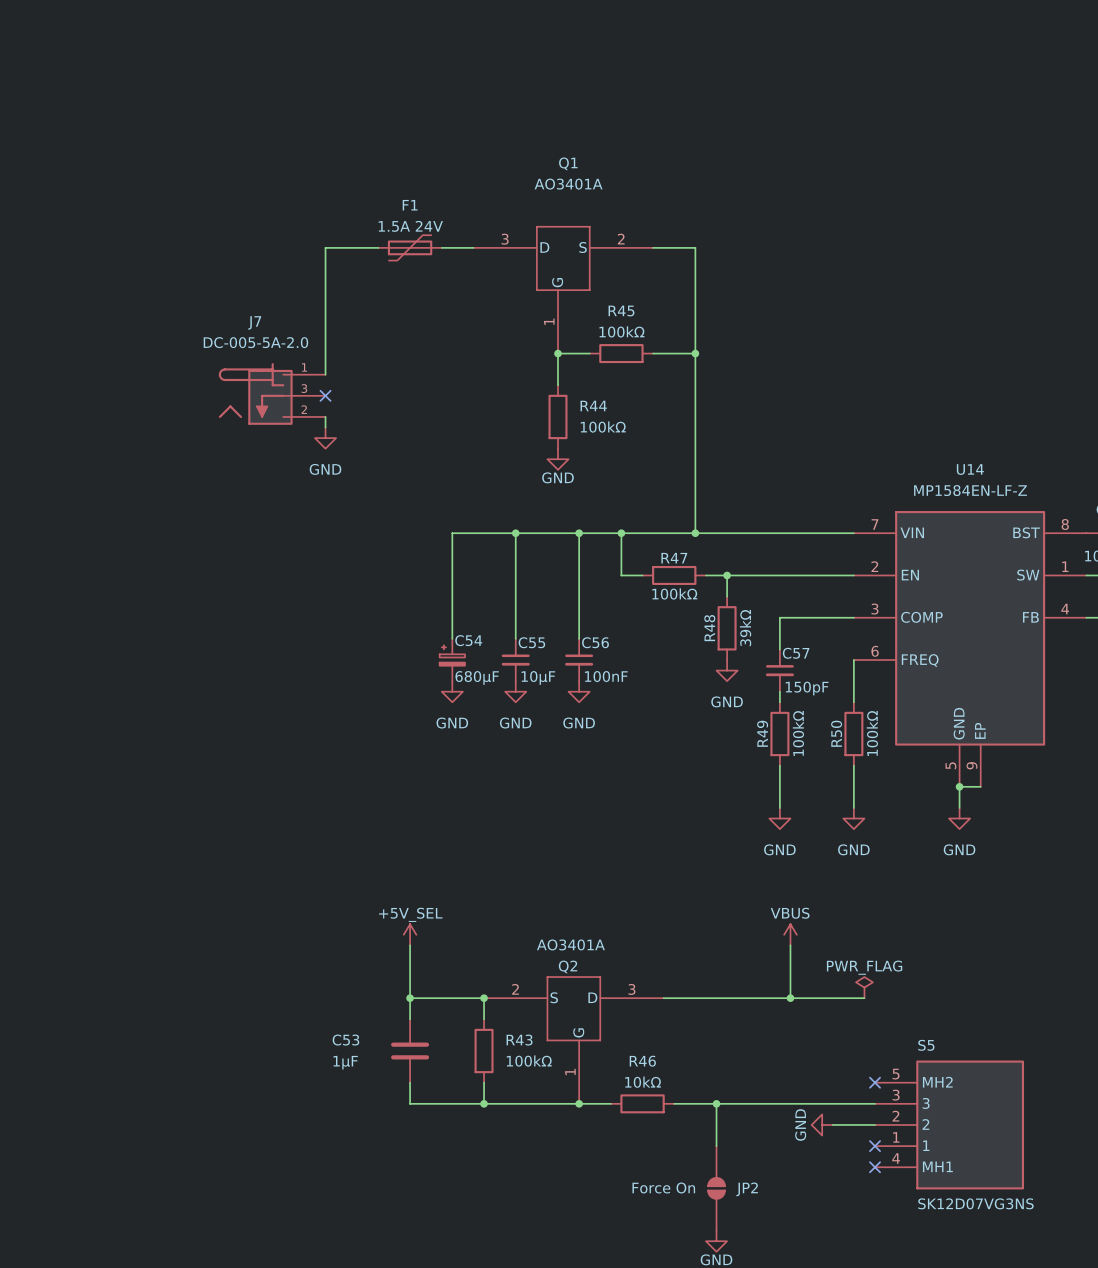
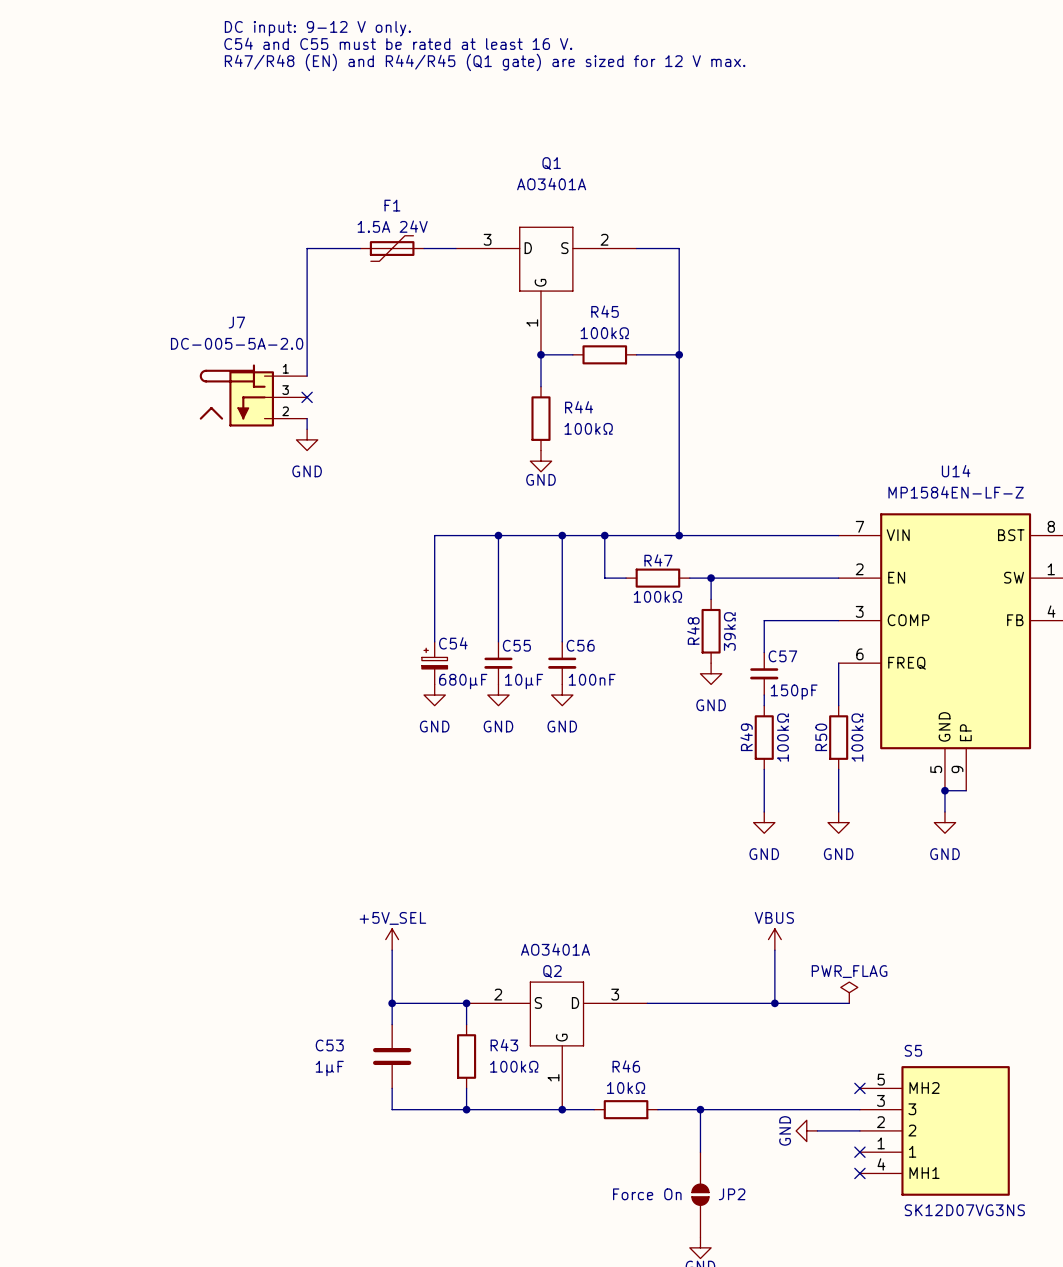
text: none -> DC input: 9-12 V only. (317, 28)
text: none -> C54 and C55 must be rated at least 16 V. (398, 43)
text: none -> R47/R48 (EN) and R44/R45 (Q1 gate) are sized for 12 V max. (485, 62)

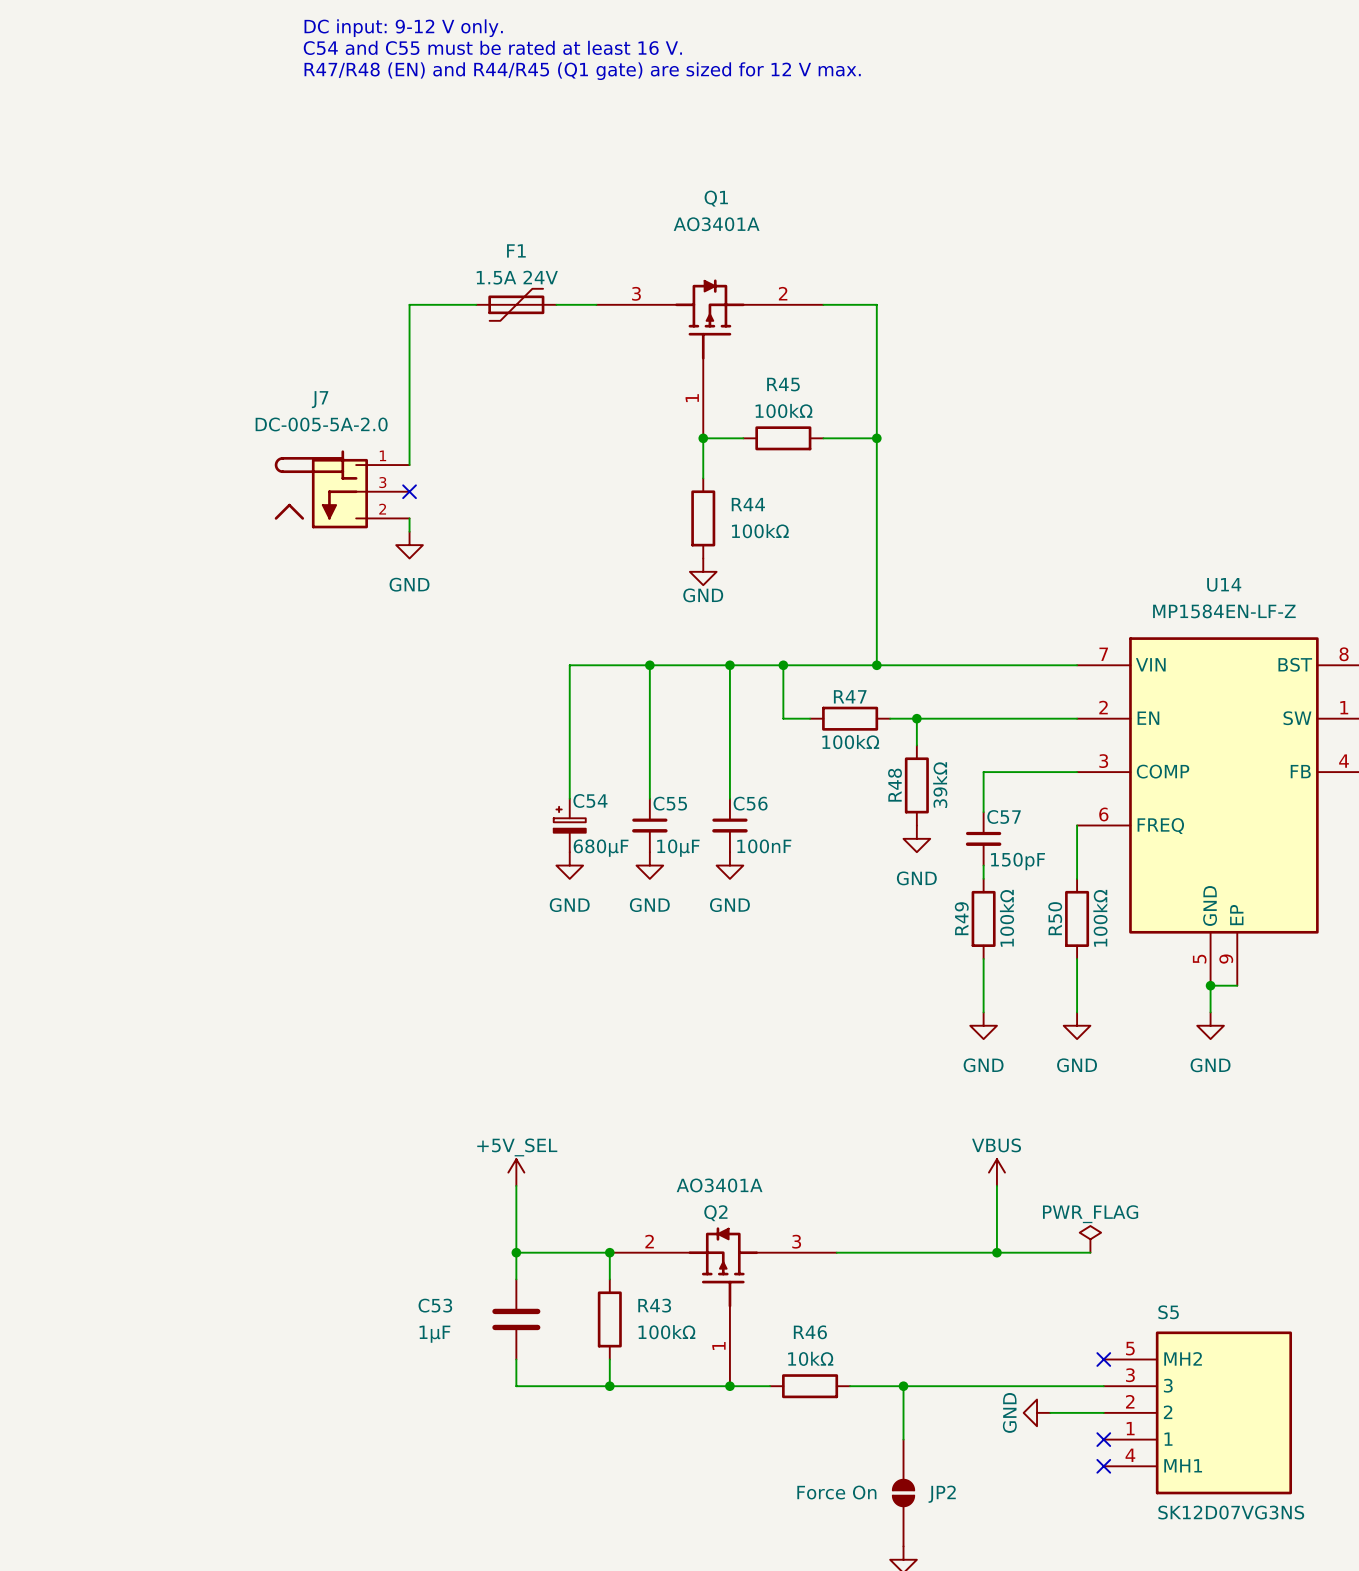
Q1 symbol: [455, 226, 637, 355] -> [596, 279, 824, 439]
Q2 symbol: [466, 981, 648, 1110] -> [609, 1227, 837, 1387]

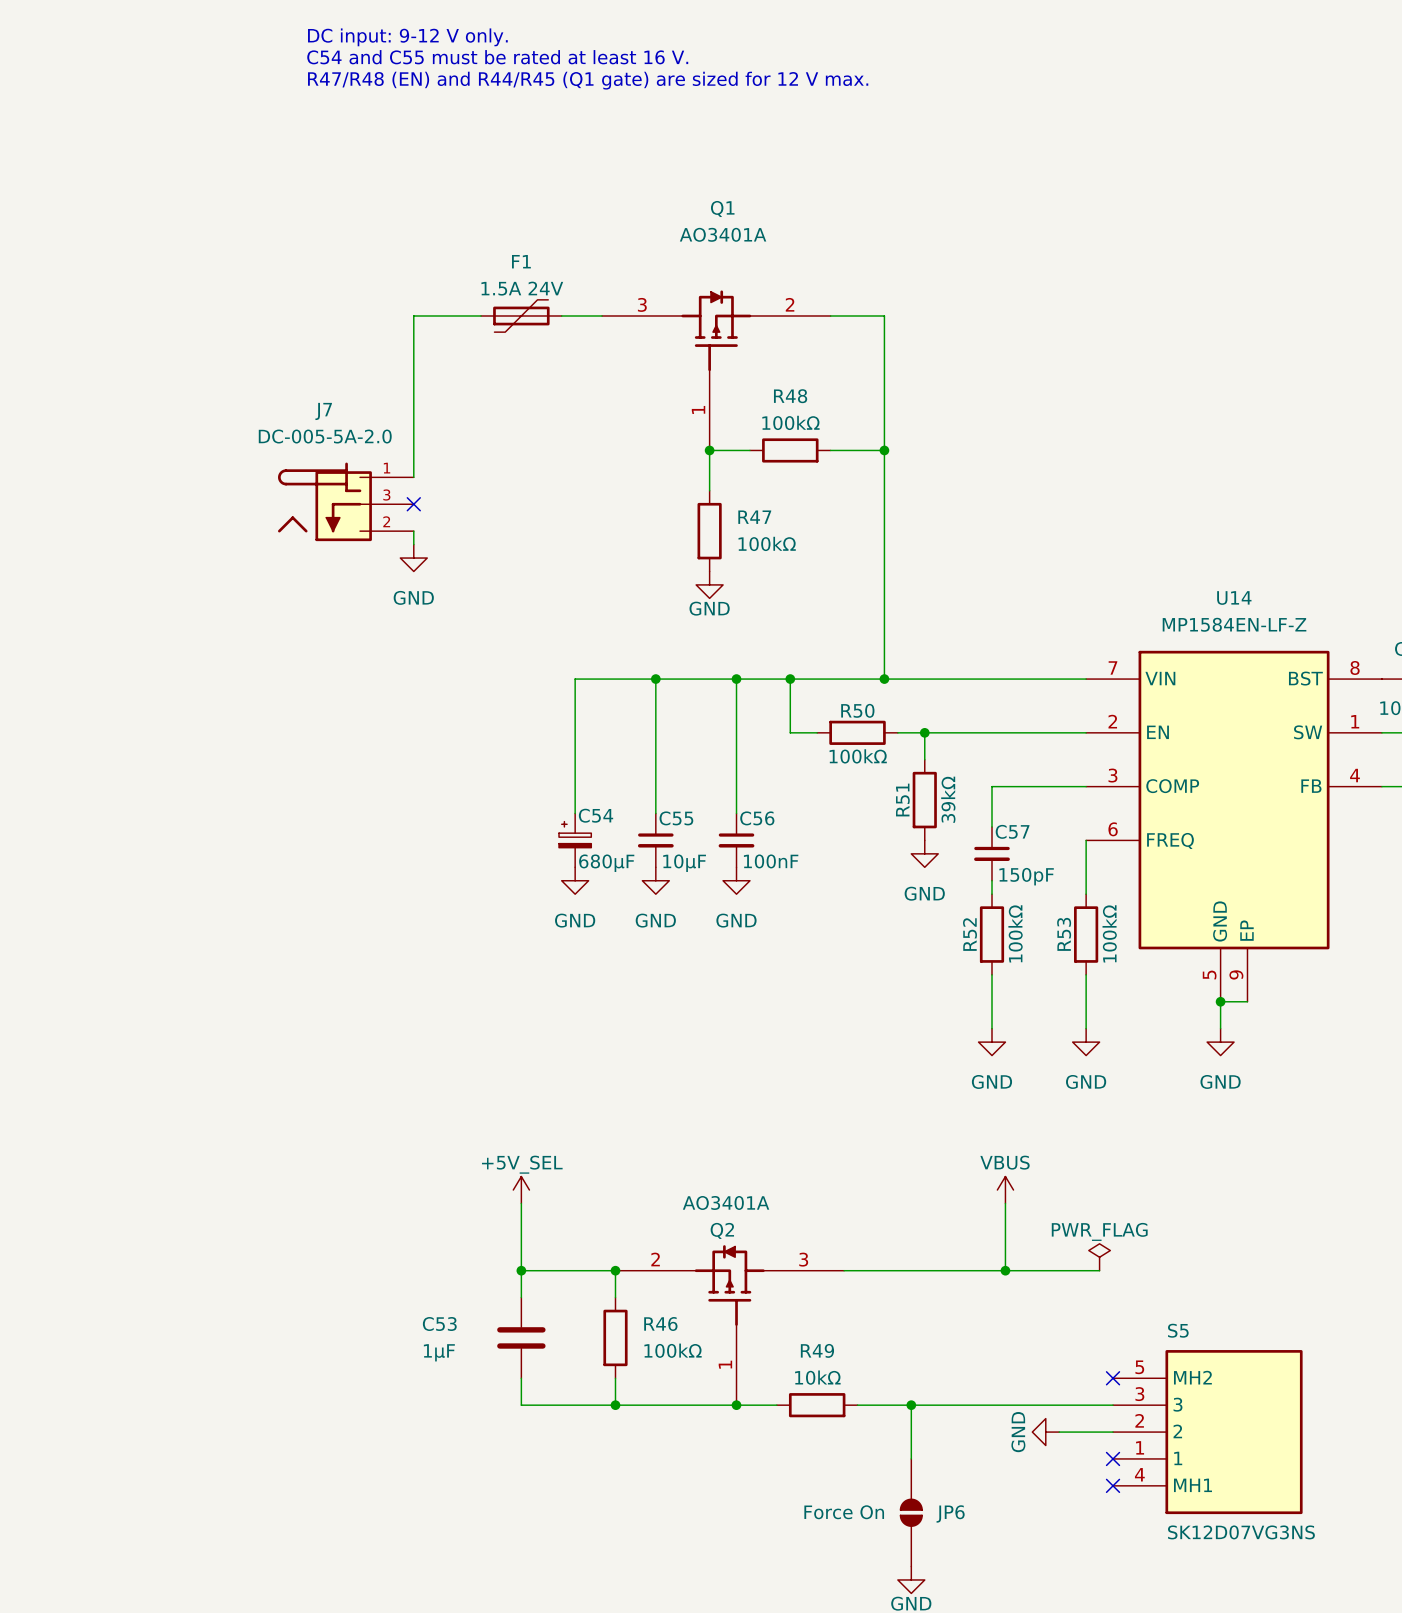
R45 name: R45 (783, 384) -> R48 (790, 396)
R44 name: R44 (748, 504) -> R47 (754, 517)
R47 name: R47 (850, 696) -> R50 (857, 710)
R48 name: R48 (895, 785) -> R51 (902, 800)
R49 name: R49 (961, 918) -> R52 (969, 934)
R50 name: R50 (1055, 918) -> R53 (1064, 934)
R43 name: R43 (654, 1305) -> R46 (660, 1324)
R46 name: R46 (810, 1332) -> R49 (817, 1350)
JP2 name: JP2 (942, 1494) -> JP6 (950, 1513)

